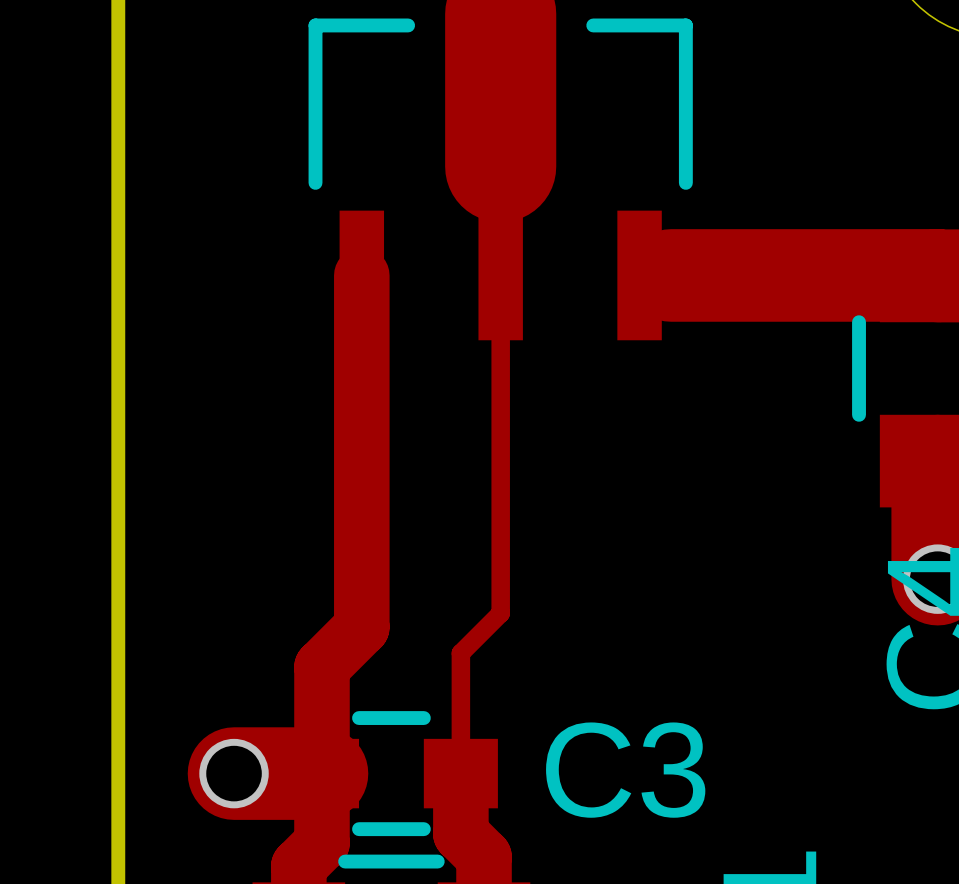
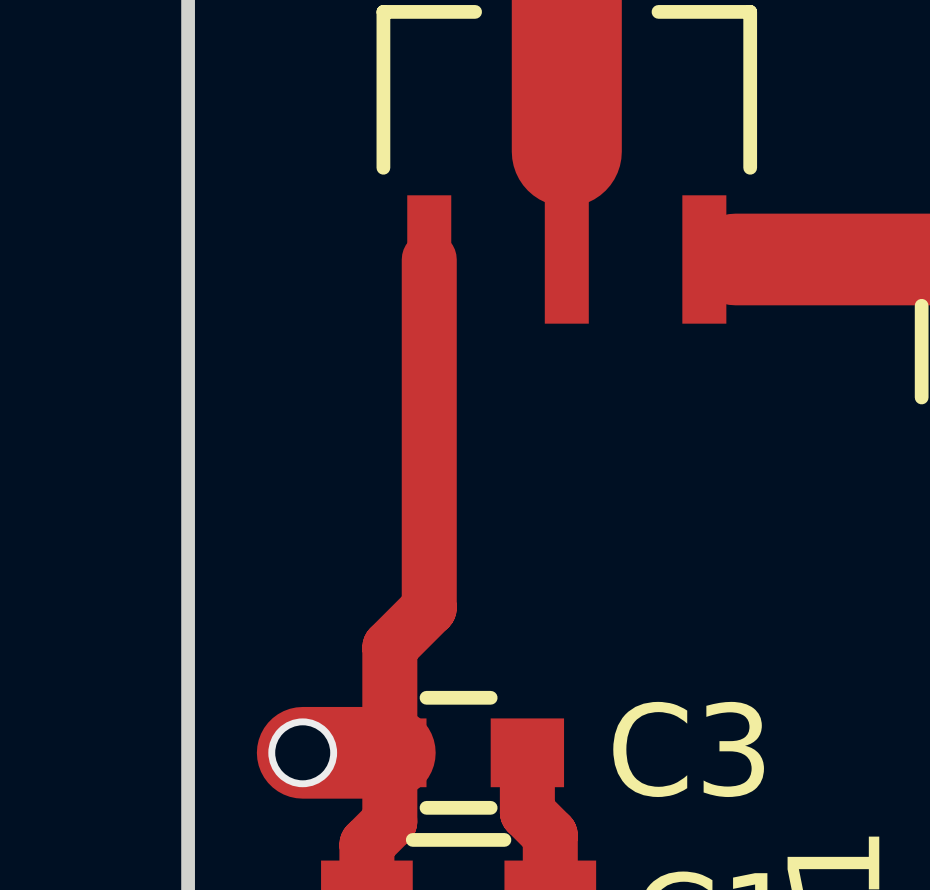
top track: (500, 90) (500, 613) (460, 653) (460, 773) -> none

